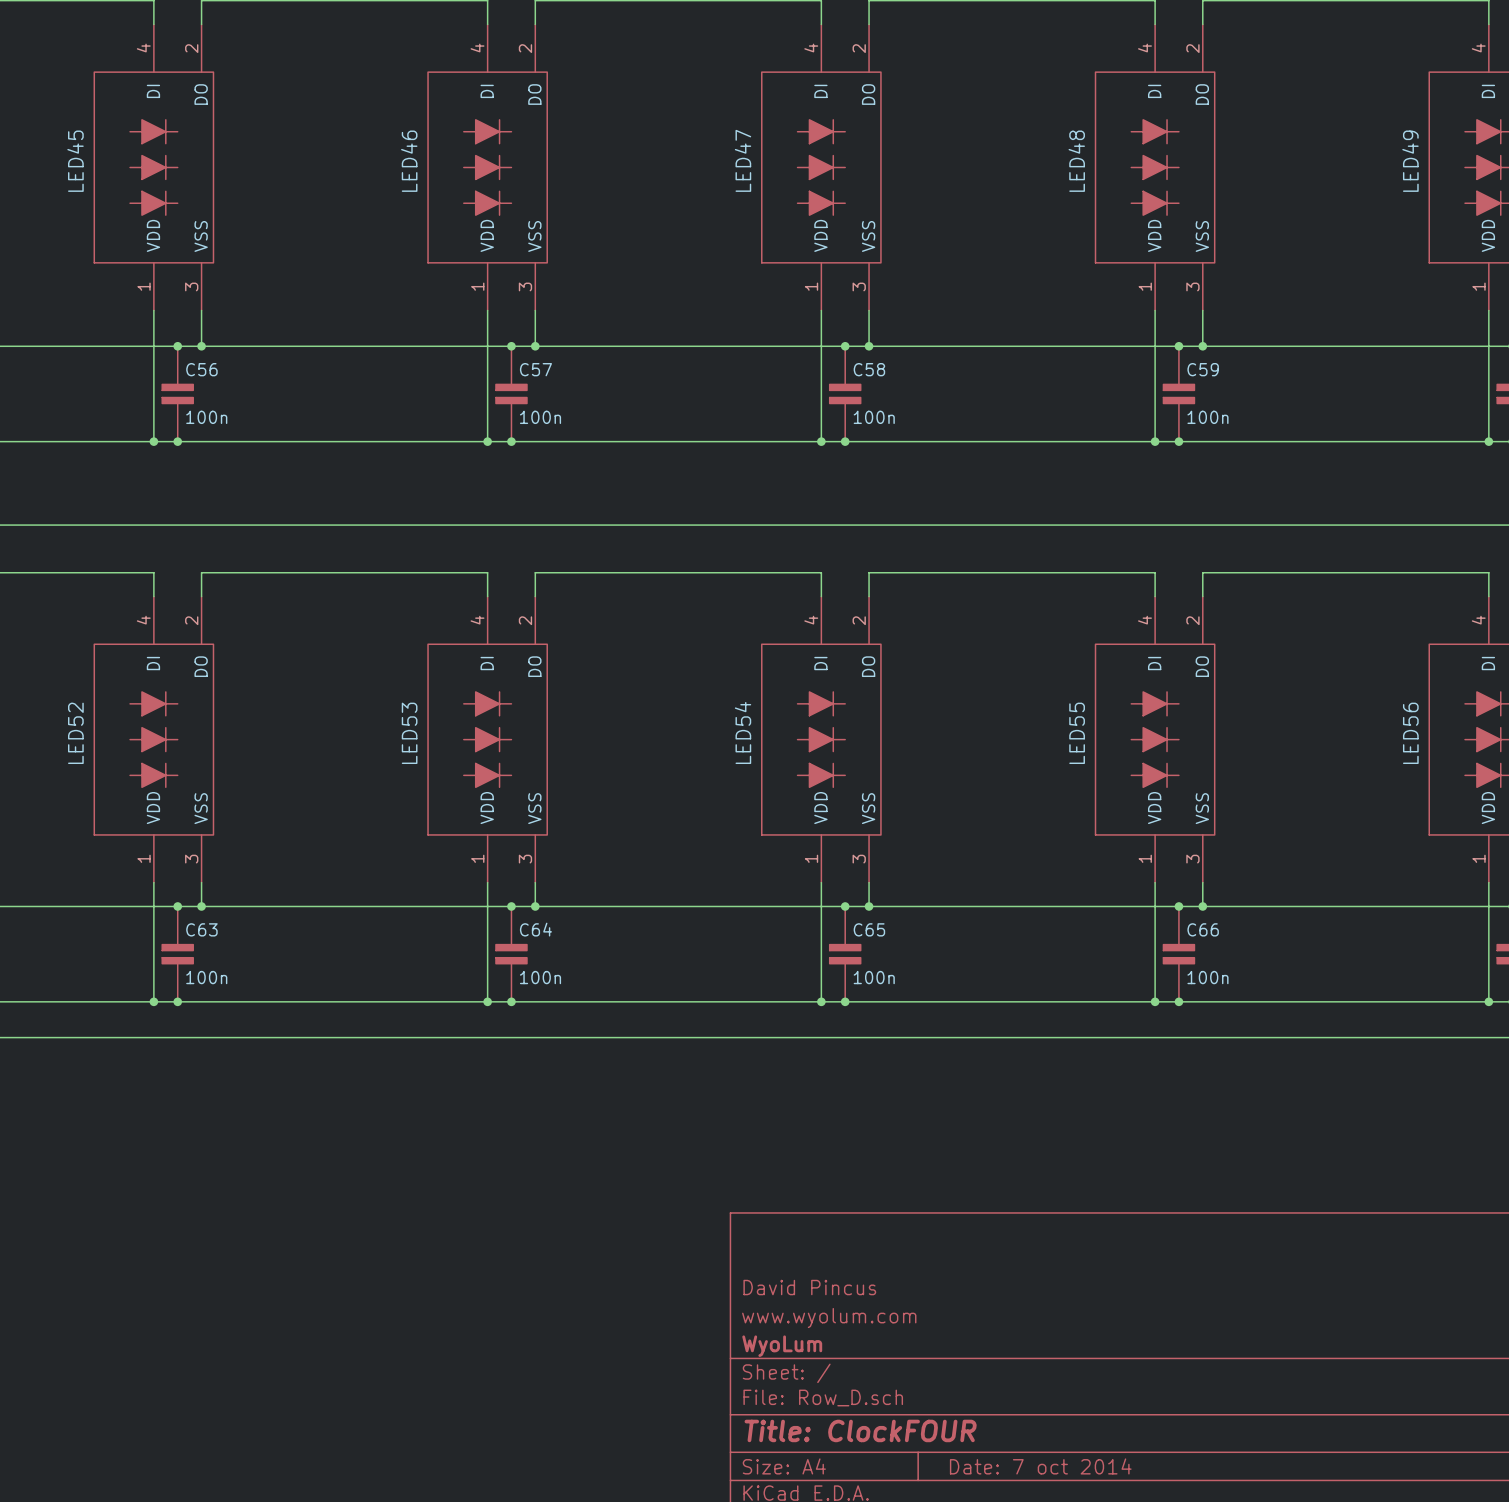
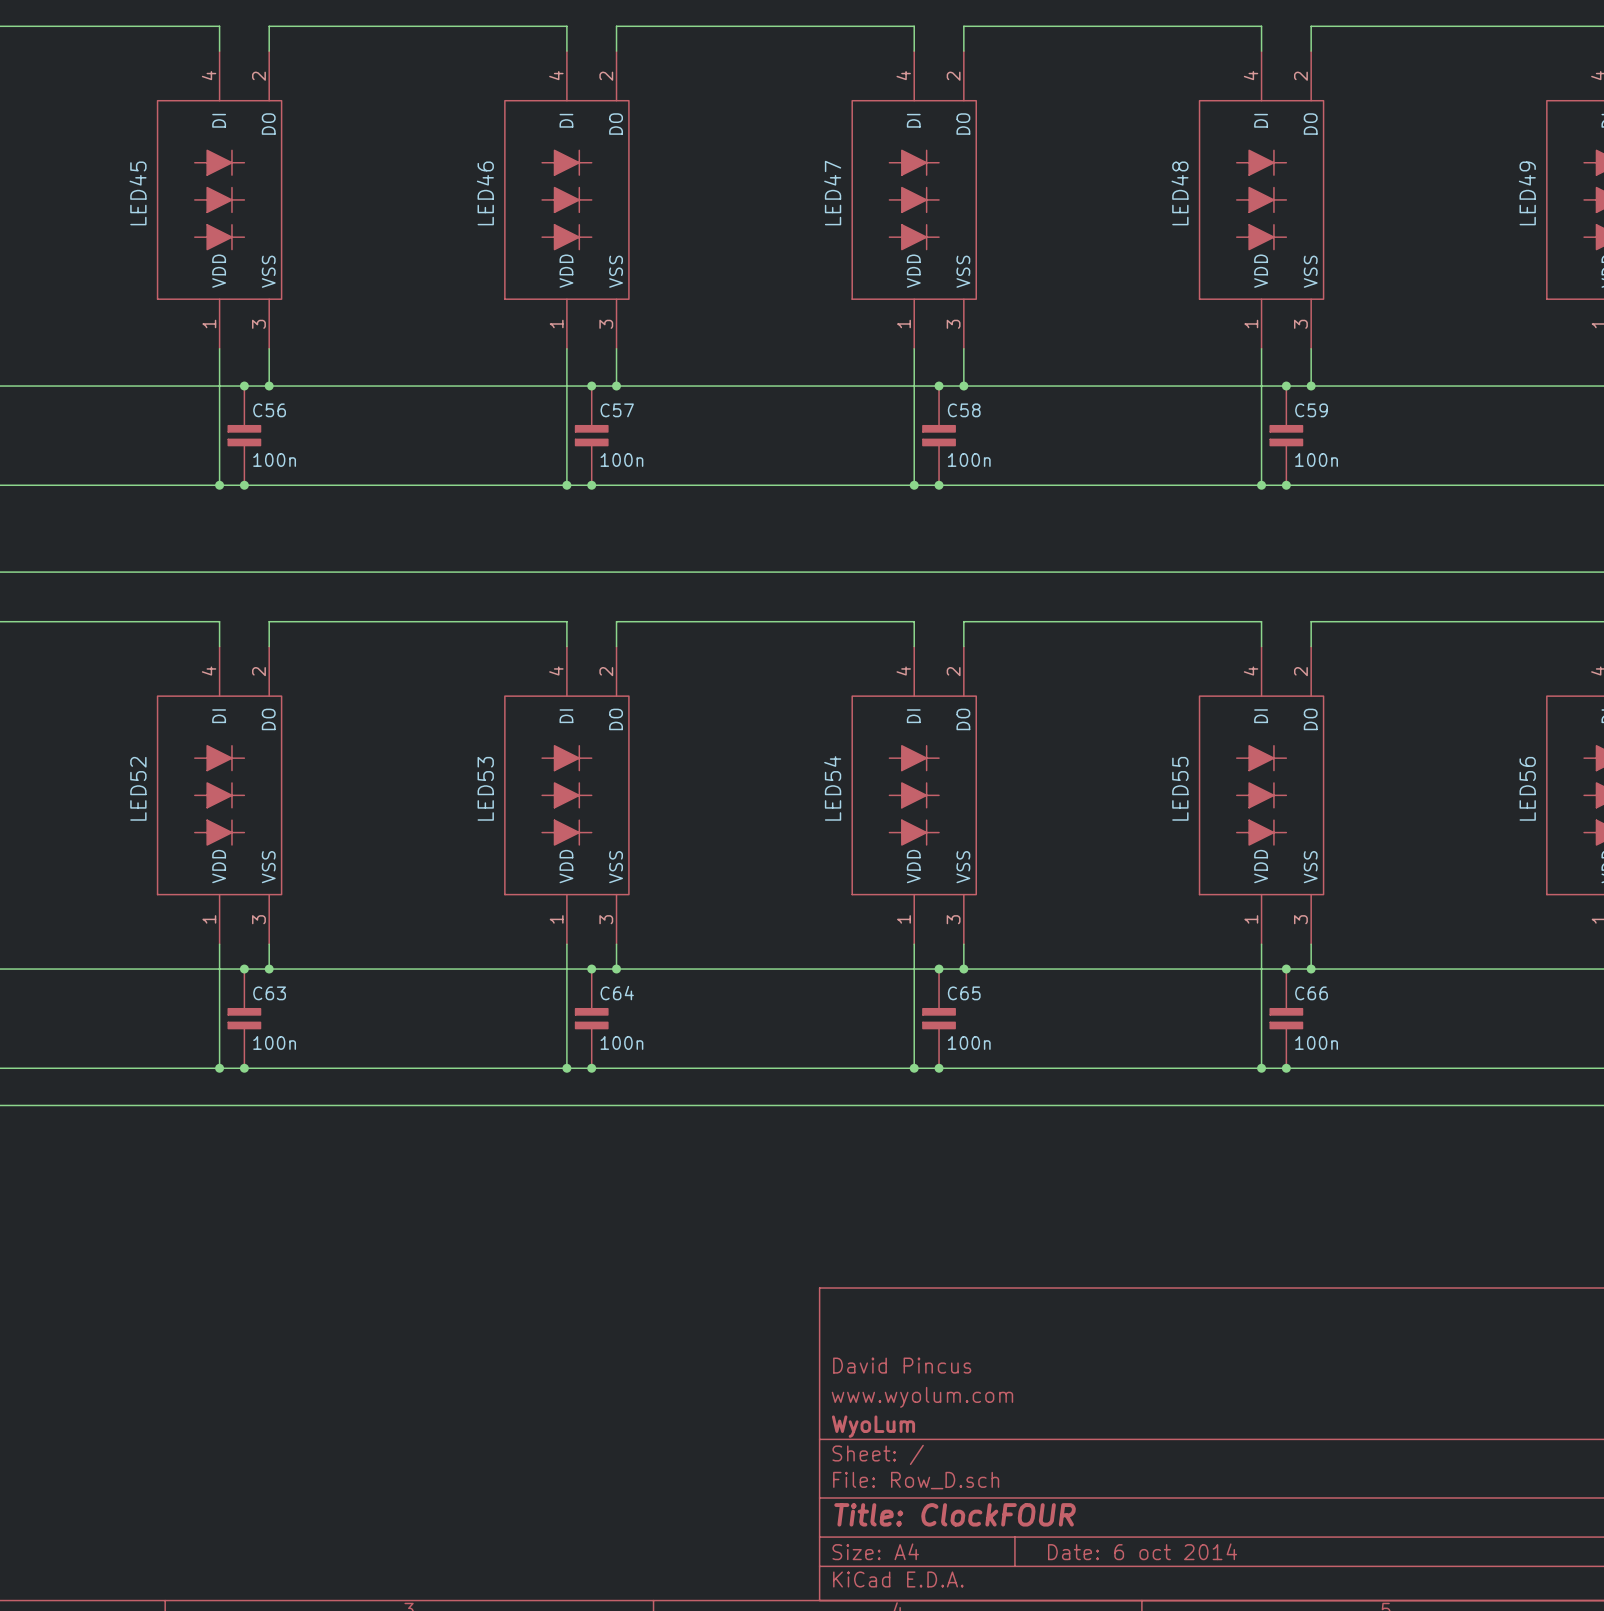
title block: Date: 7 oct 2014 (1040, 1466) -> Date: 6 oct 2014 (1142, 1551)

